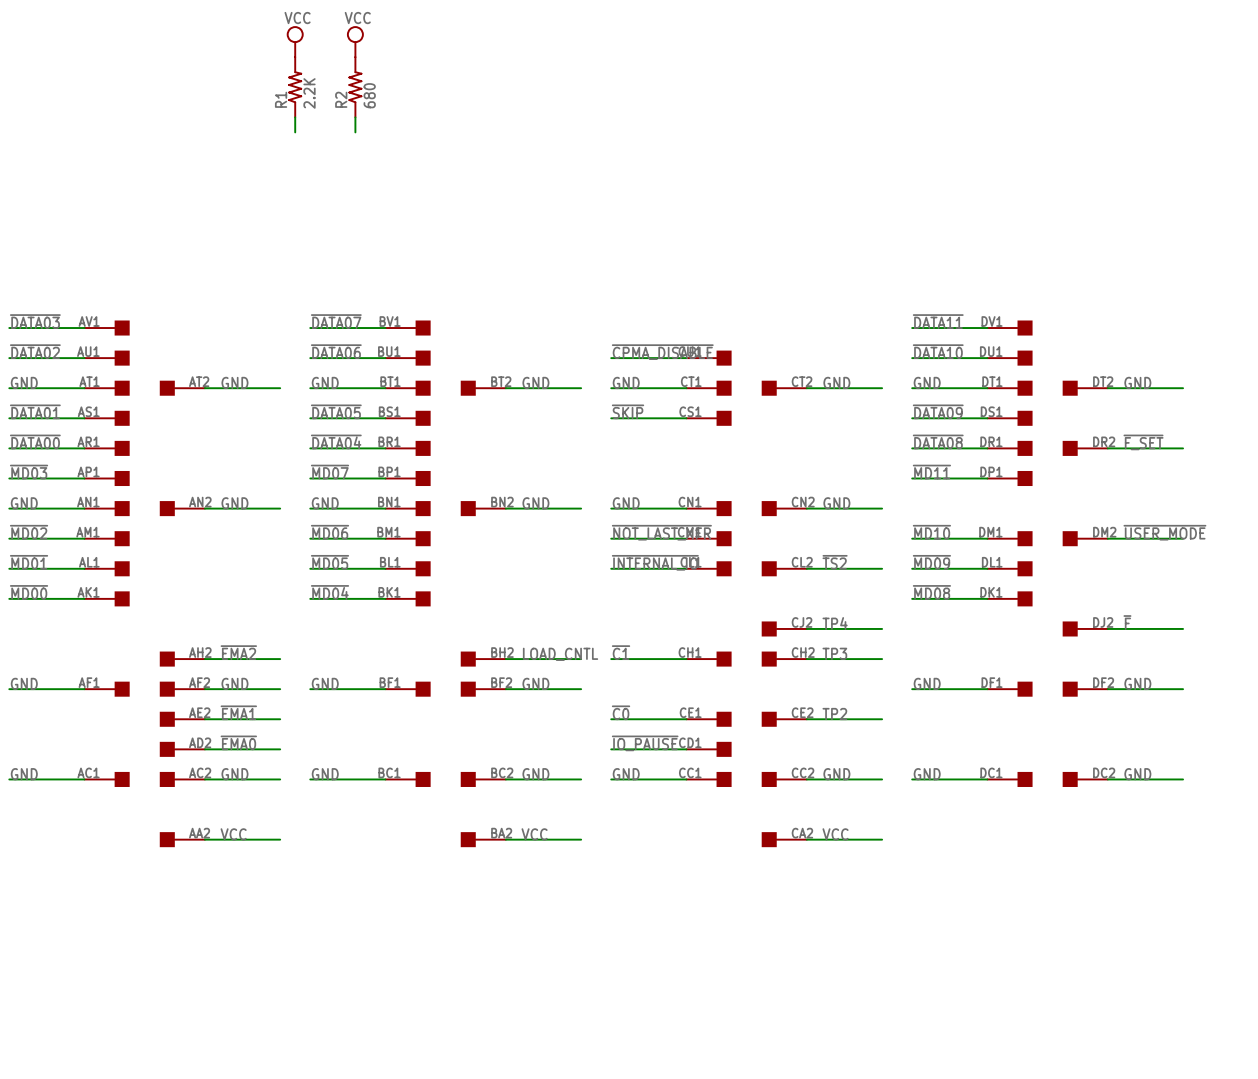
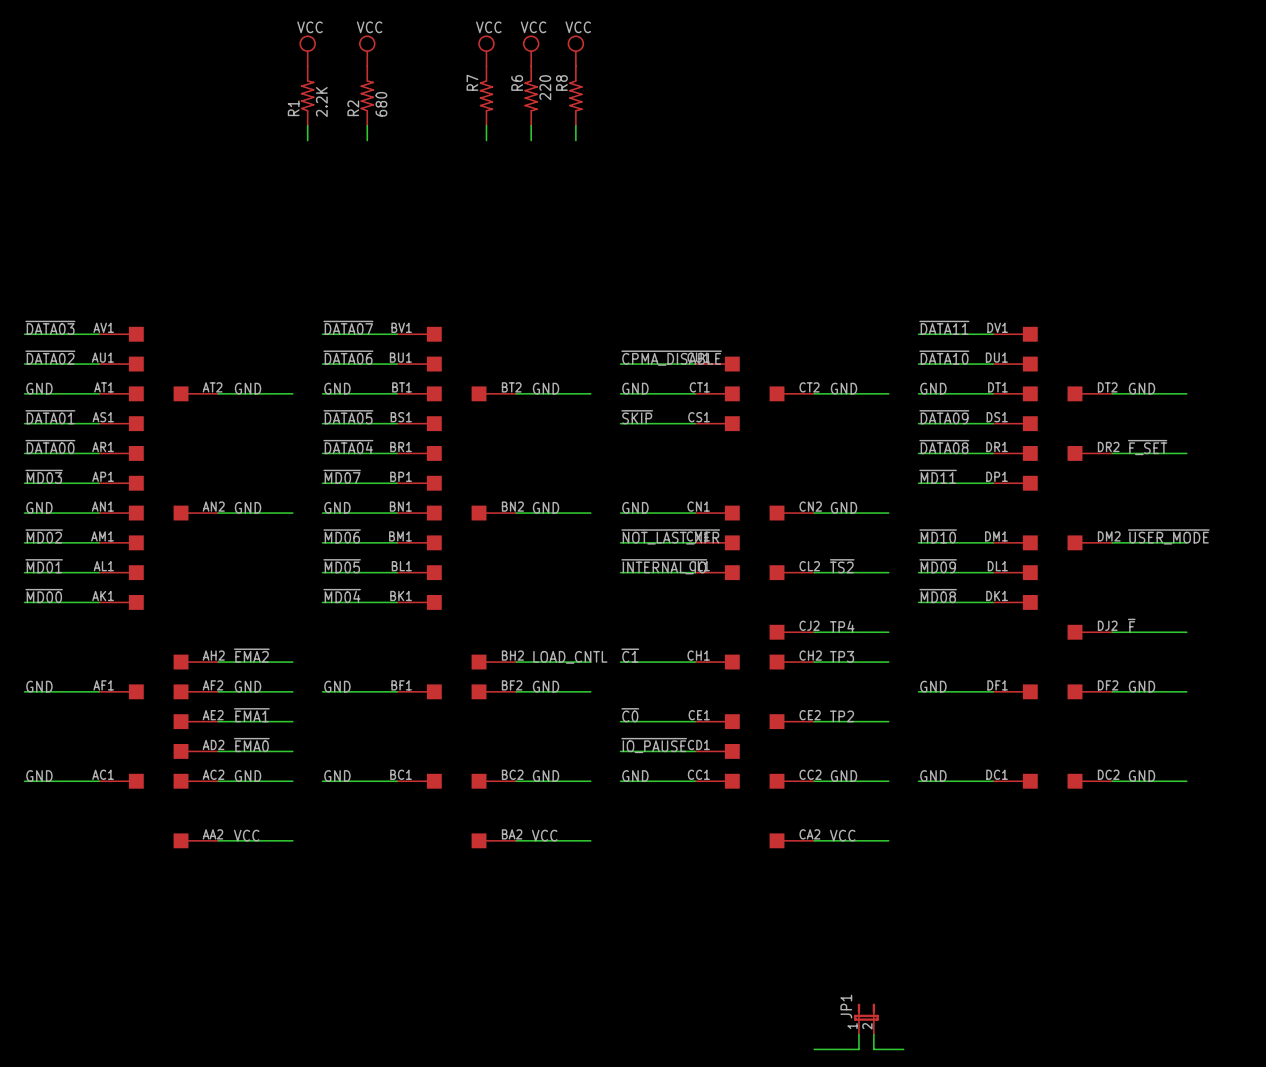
power symbol: none -> VCC (486, 50)
power symbol: none -> VCC (531, 50)
power symbol: none -> VCC (575, 50)
R7: none -> (486, 95)
R6: none -> 220 (531, 95)
R8: none -> (575, 95)
wire: none -> (486, 125) (486, 140)
wire: none -> (531, 125) (531, 140)
wire: none -> (575, 125) (575, 140)
JP1: none -> (866, 1019)
wire: none -> (858, 1034) (858, 1049) (814, 1049)
wire: none -> (873, 1034) (873, 1049) (903, 1049)

